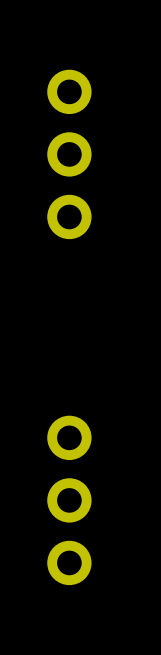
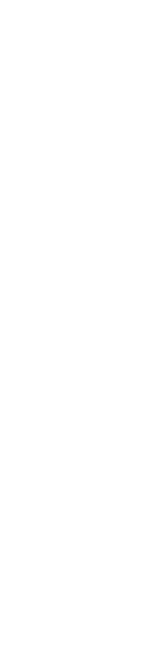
part: (69, 154) -> none
part: (69, 500) -> none

